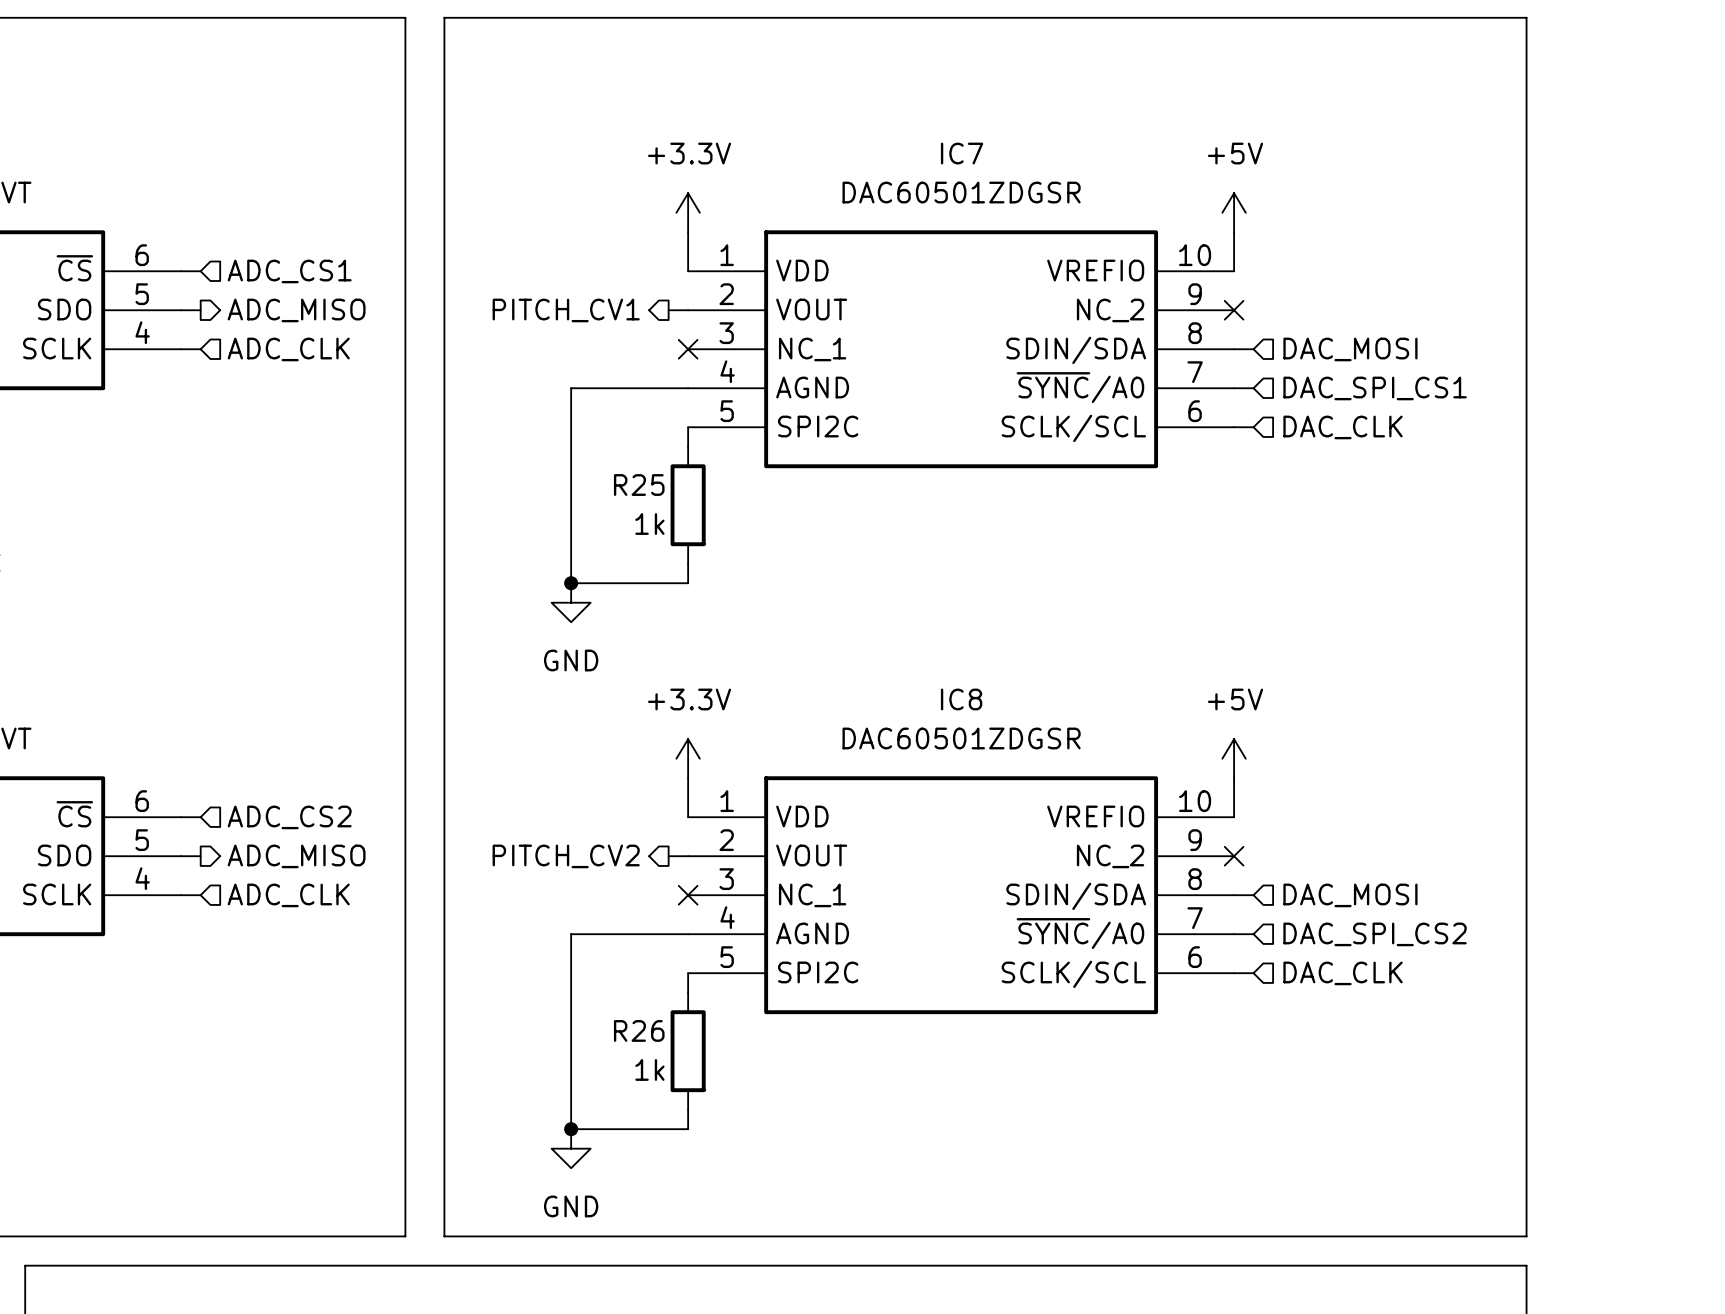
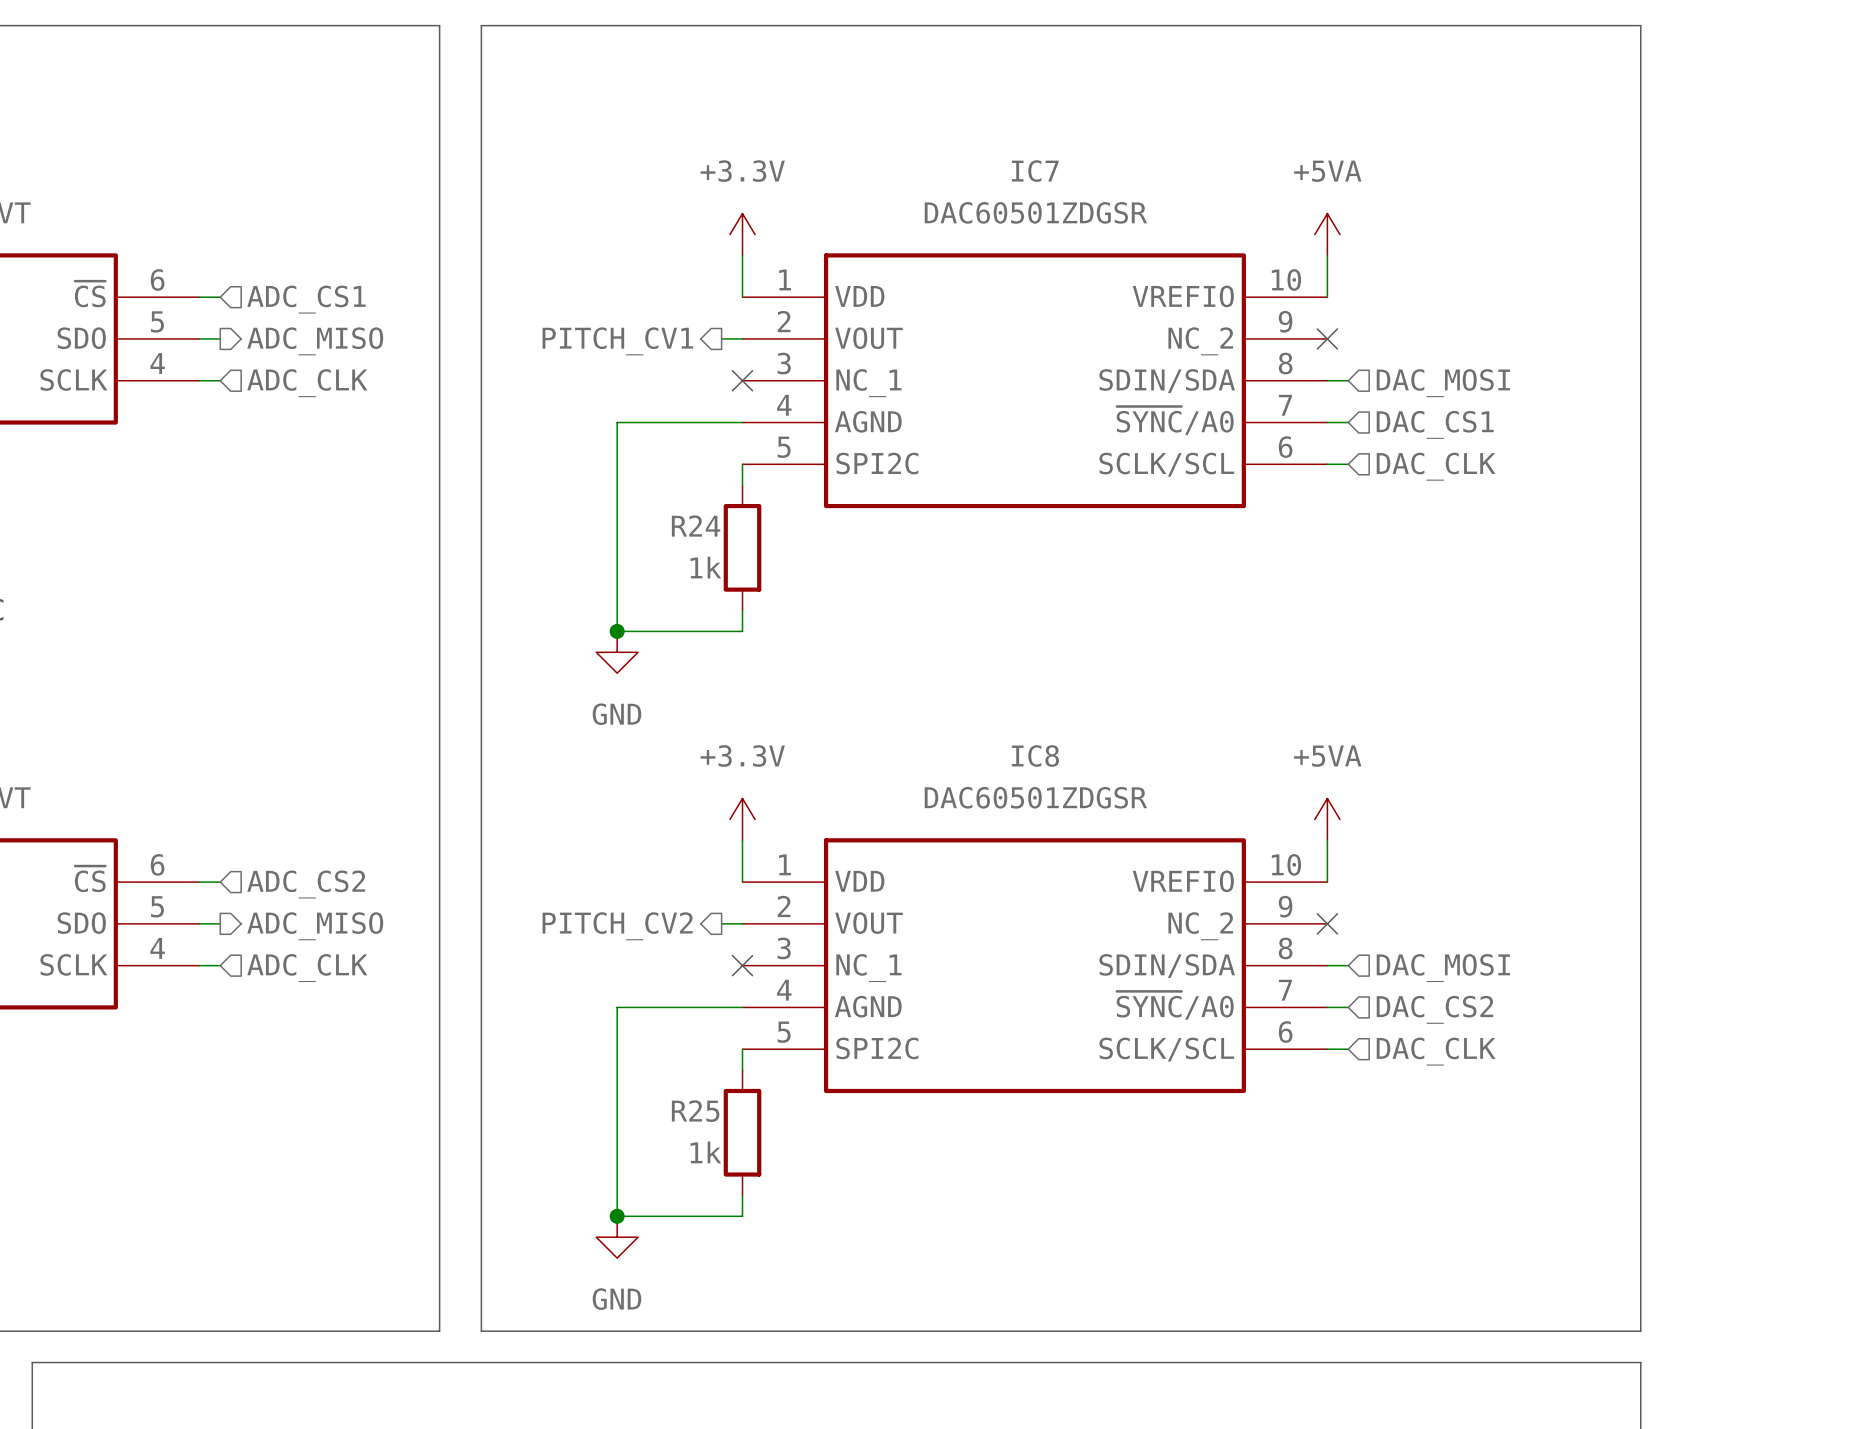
power symbol: +5V (1234, 212) -> +5VA (1327, 234)
hierarchical label: DAC_SPI_CS1 (1375, 388) -> DAC_CS1 (1435, 424)
R25 name: R25 (639, 485) -> R24 (696, 526)
power symbol: +5V (1234, 758) -> +5VA (1327, 819)
hierarchical label: DAC_SPI_CS2 (1375, 934) -> DAC_CS2 (1434, 1009)
R26 name: R26 (639, 1030) -> R25 (695, 1111)

